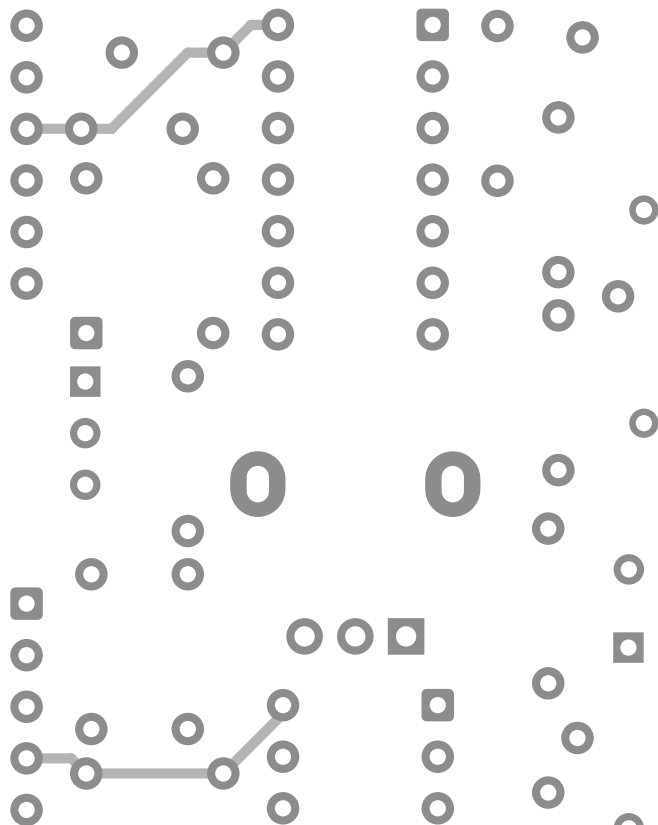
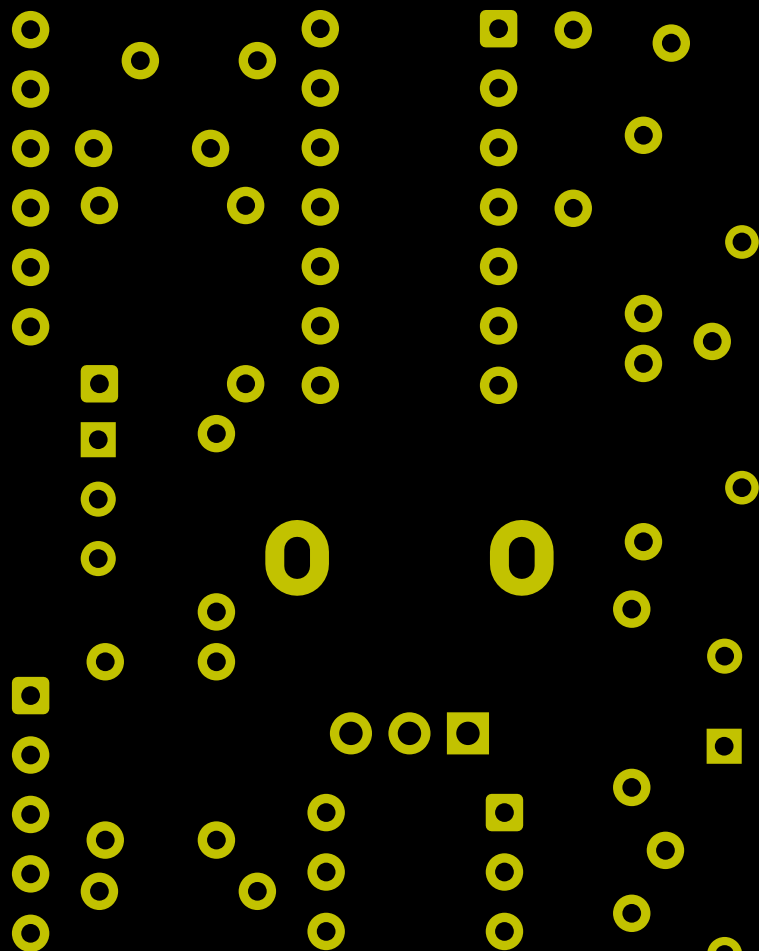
track: (277, 24) (251, 24) (223, 52) (187, 52) (111, 128) (26, 128) -> none
track: (283, 705) (283, 713) (223, 773) (86, 773) (71, 758) (26, 758) -> none

